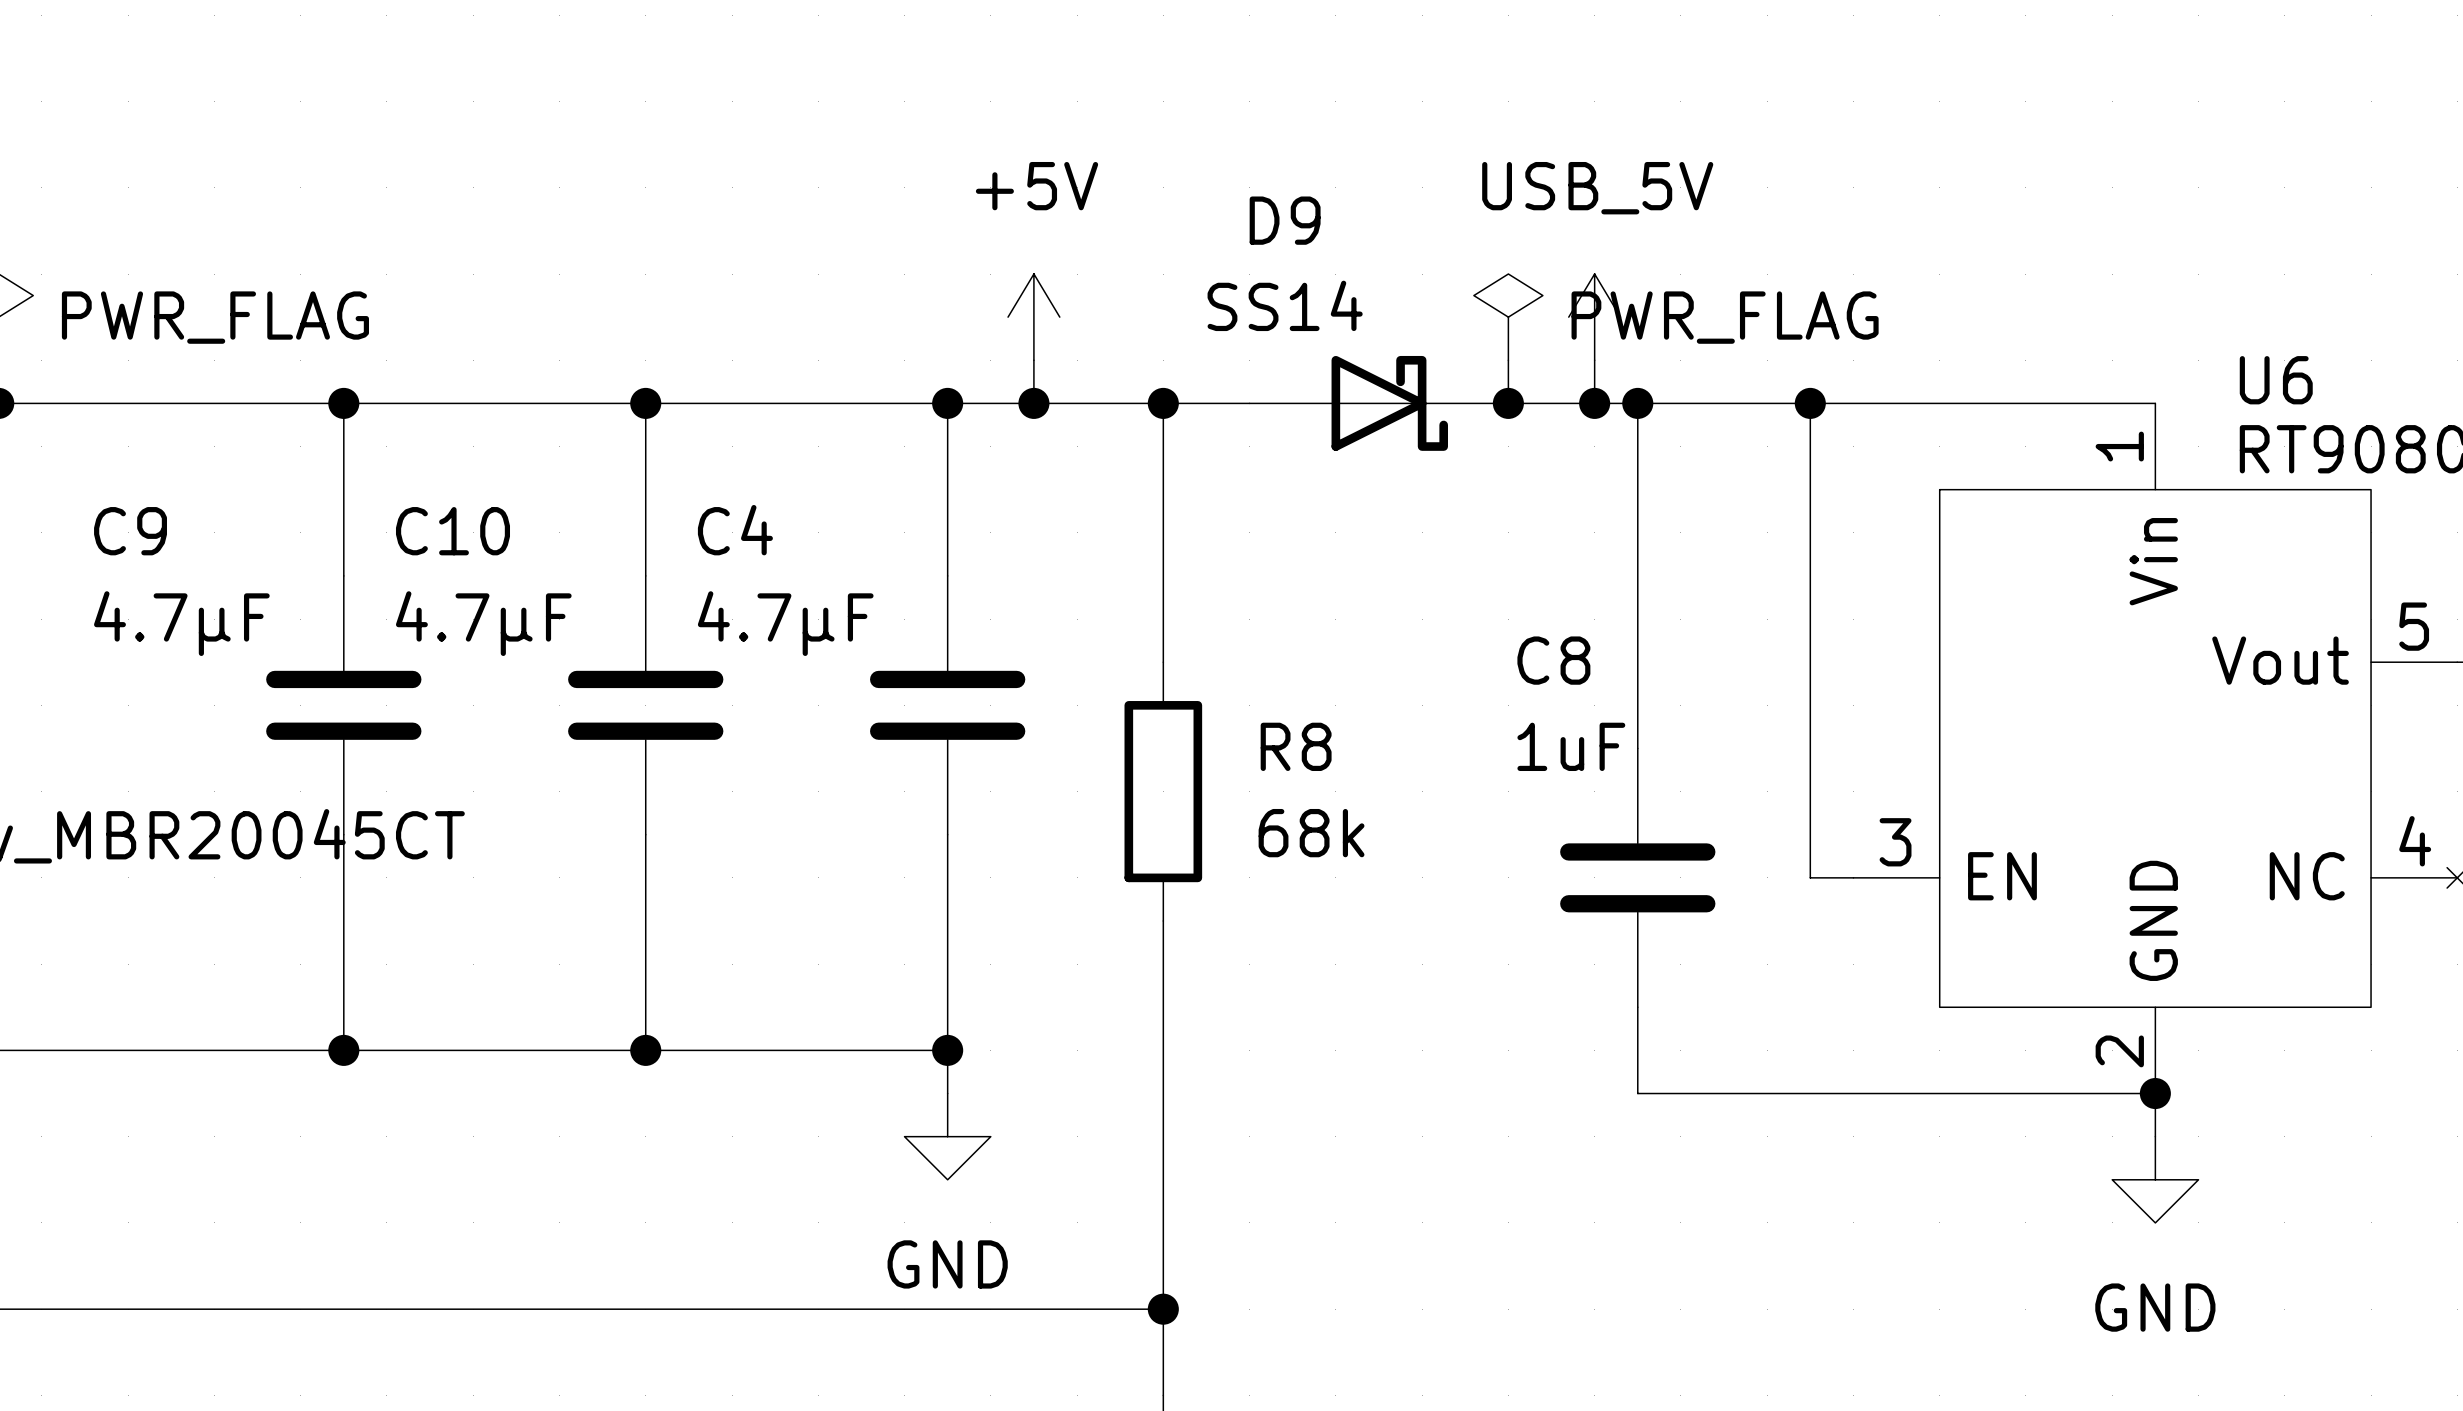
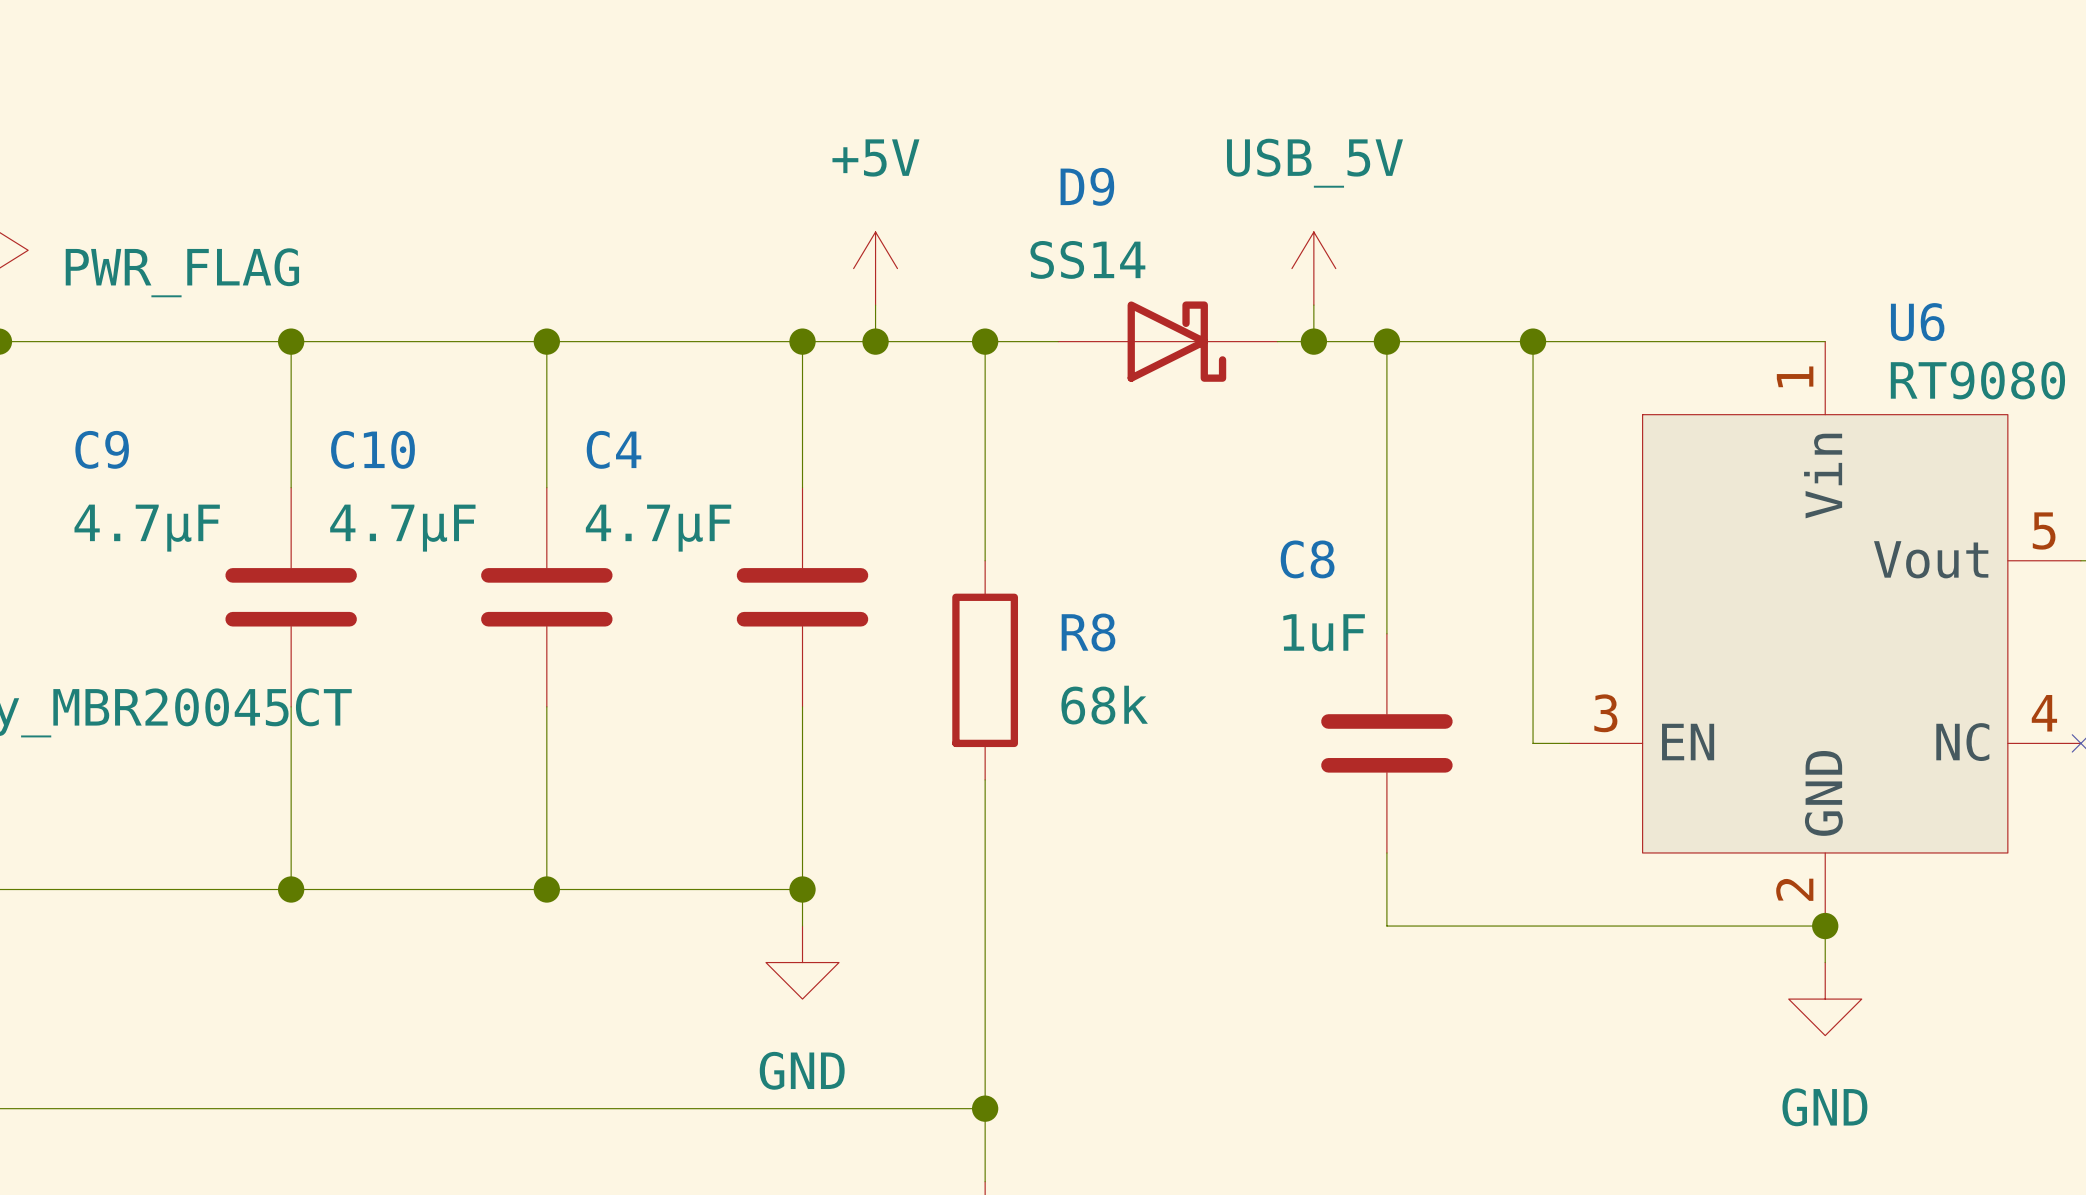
power symbol: PWR_FLAG (1508, 317) -> none
power symbol position: USB_5V (1594, 317) -> USB_5V (1313, 268)
wire: (1508, 360) (1508, 403) -> none
wire: (1594, 360) (1594, 403) -> (1313, 305) (1313, 341)
junction: (1508, 403) -> none
junction: none -> (1313, 341)
junction: (1594, 403) -> none

